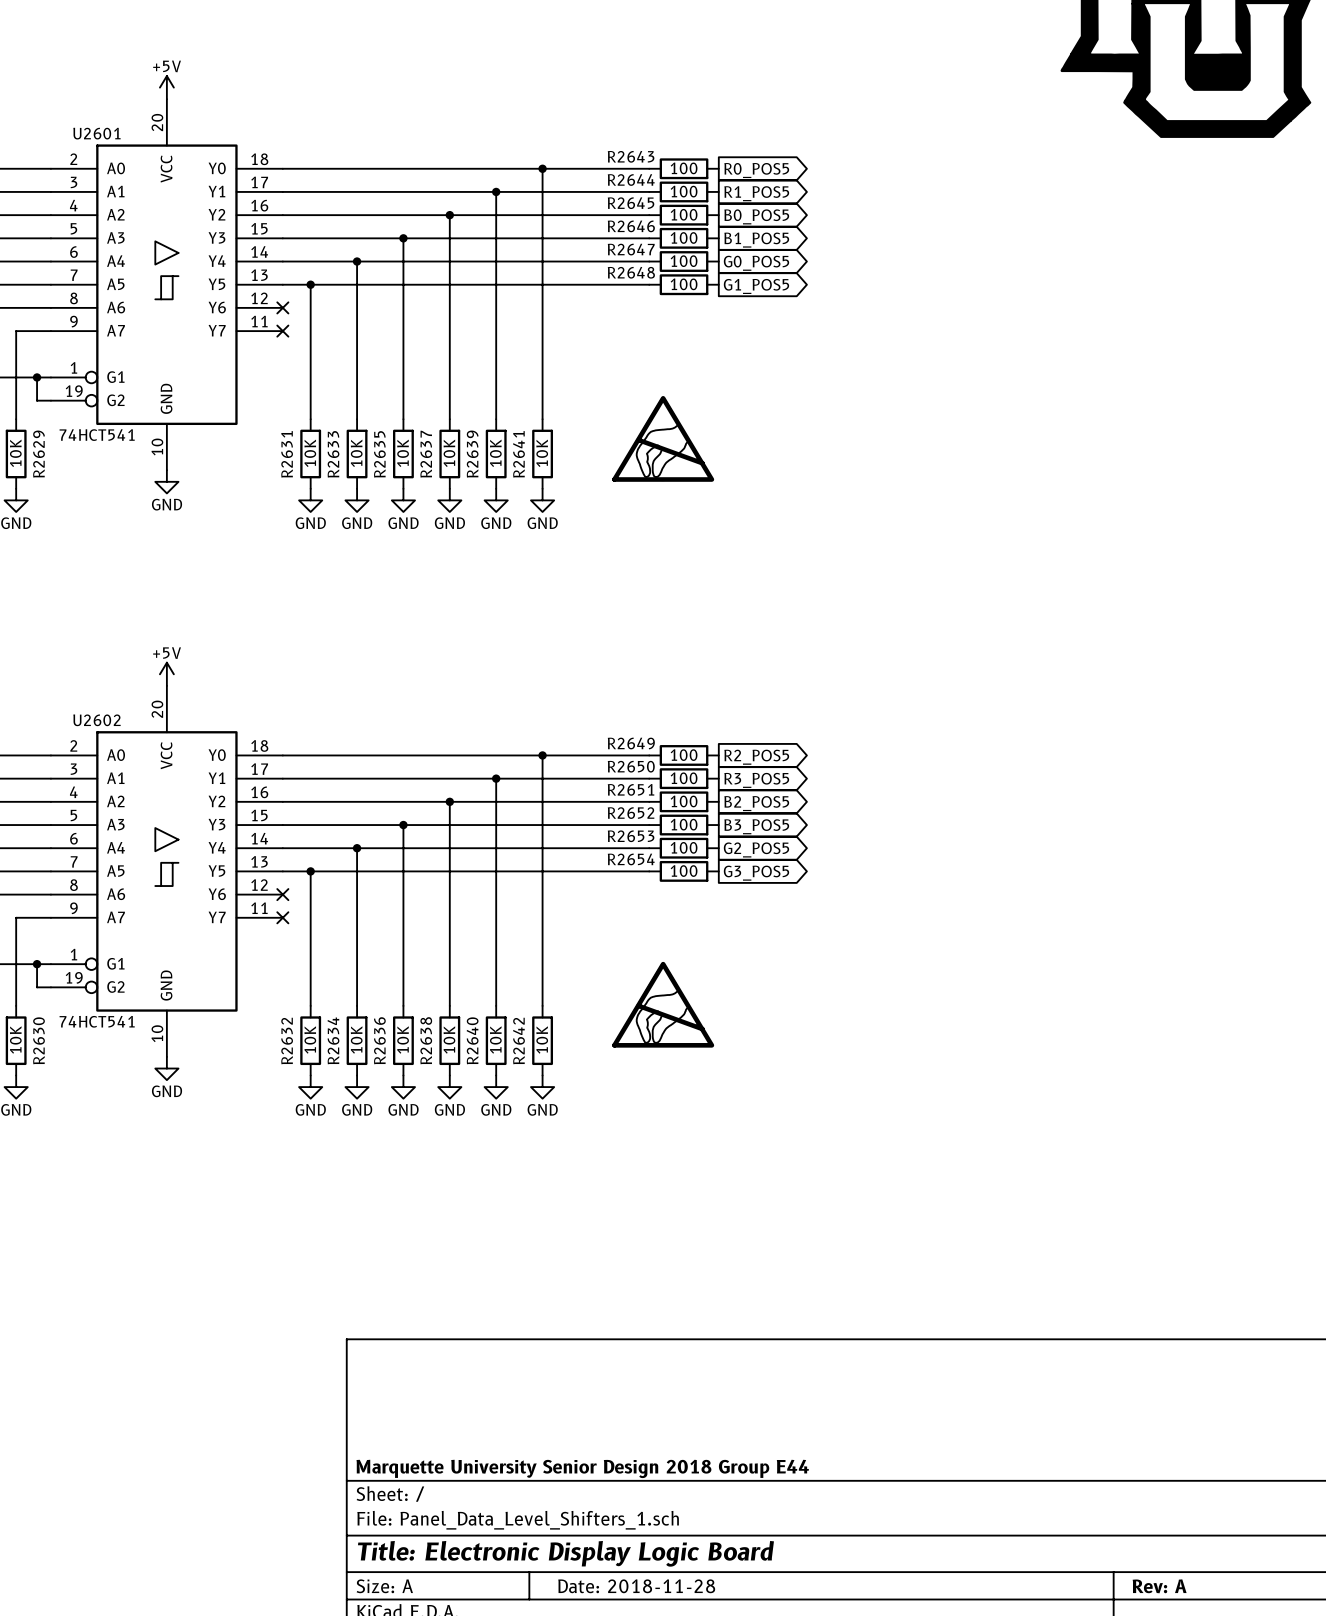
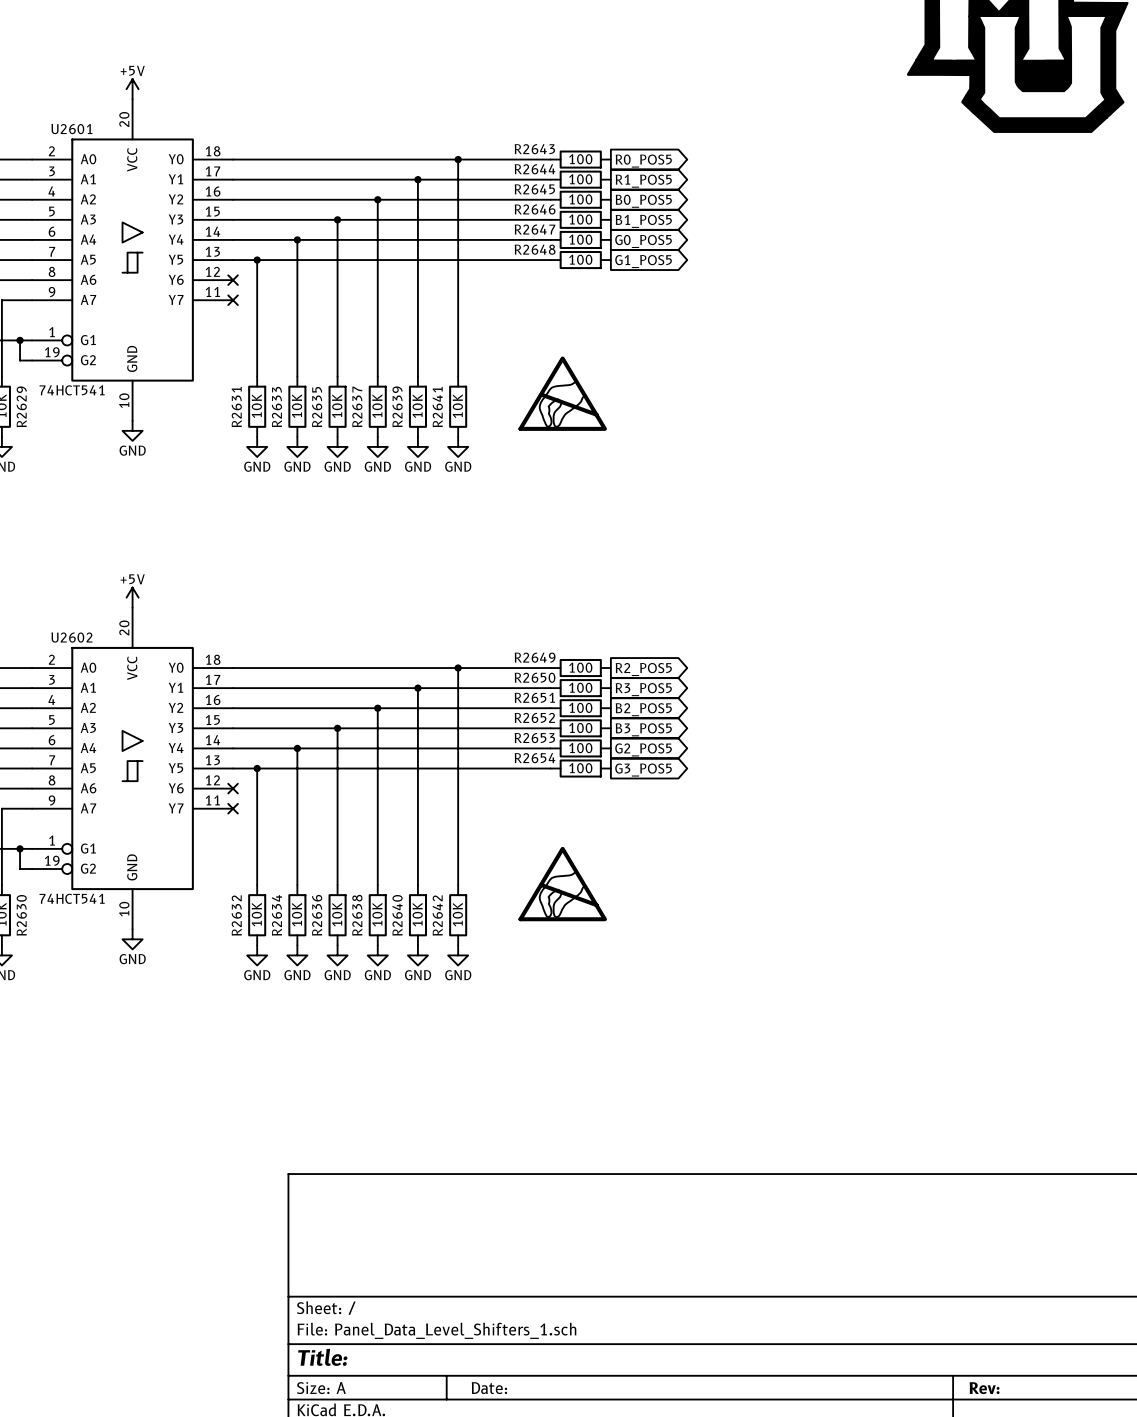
title block: Marquette University Senior Design 2018 Group E44 (582, 1468) -> none
title block: Title: Electronic Display Logic Board (565, 1553) -> Title: (322, 1357)
title block: Date: 2018-11-28 (636, 1586) -> Date: (489, 1388)
title block: Rev: A (1159, 1586) -> Rev: (984, 1388)

